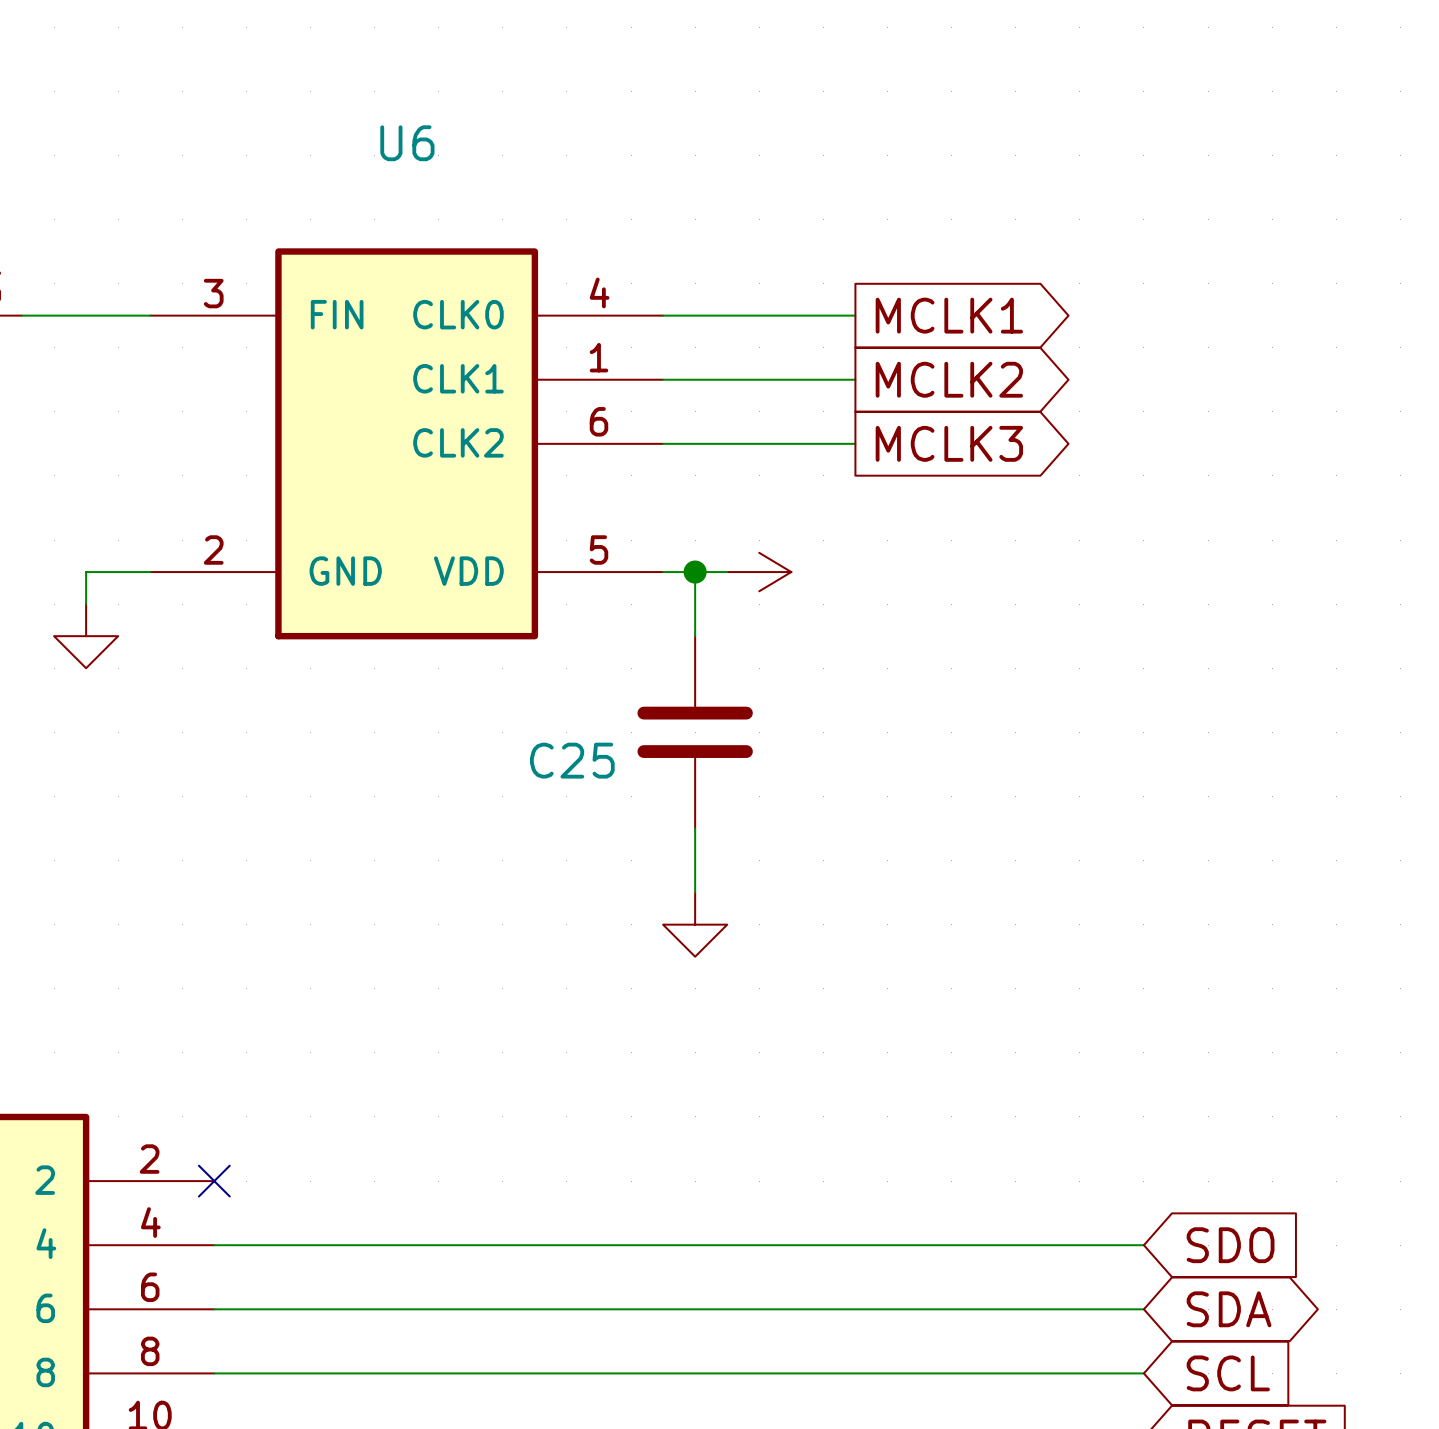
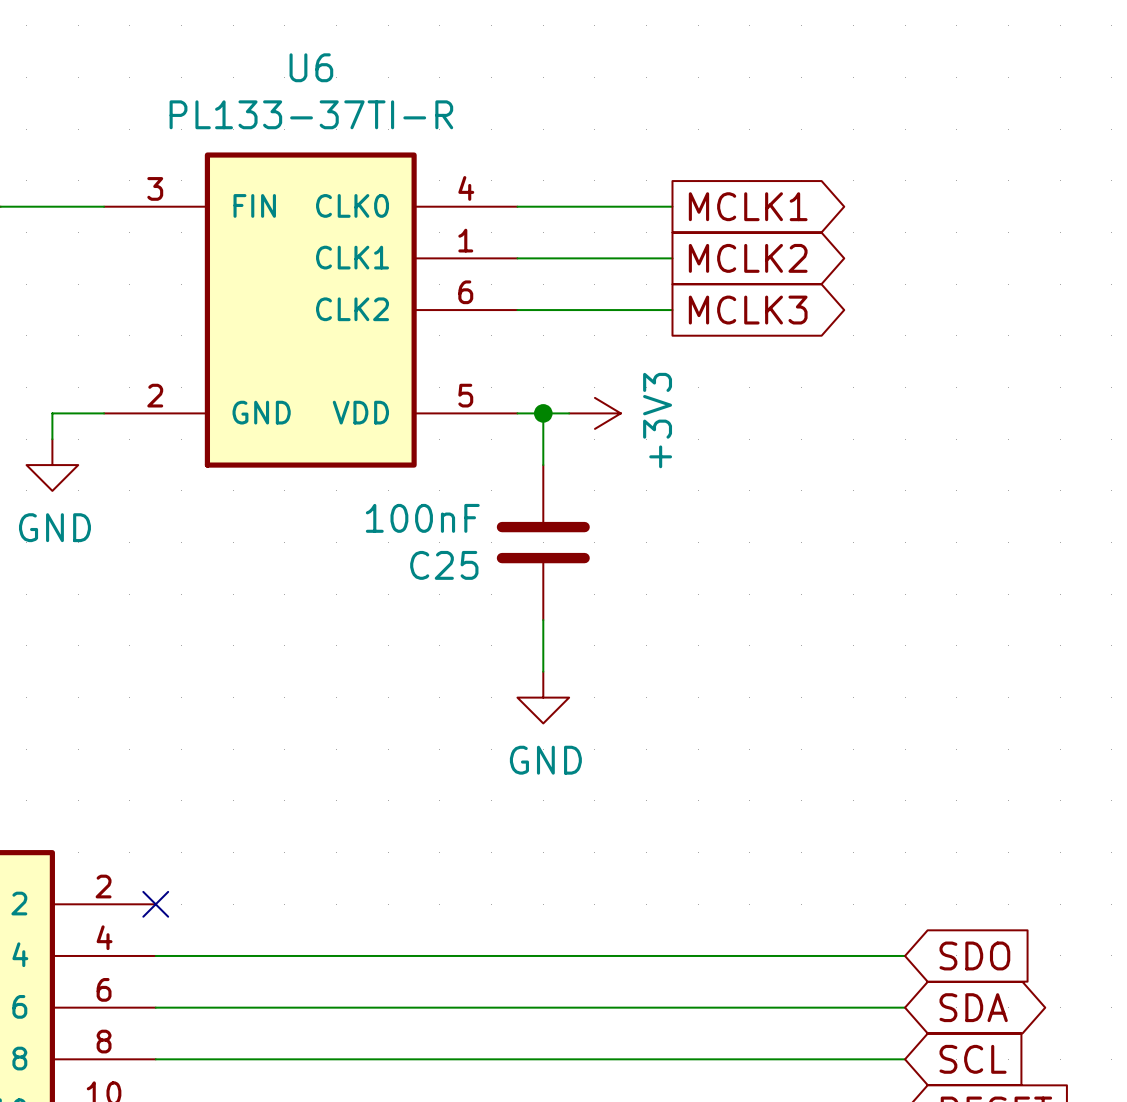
U6 value: none -> PL133-37TI-R (311, 114)
power symbol text: none -> +3V3 (657, 420)
C25 value: none -> 100nF (422, 518)
power symbol text: none -> GND (54, 527)
power symbol text: none -> GND (545, 760)

